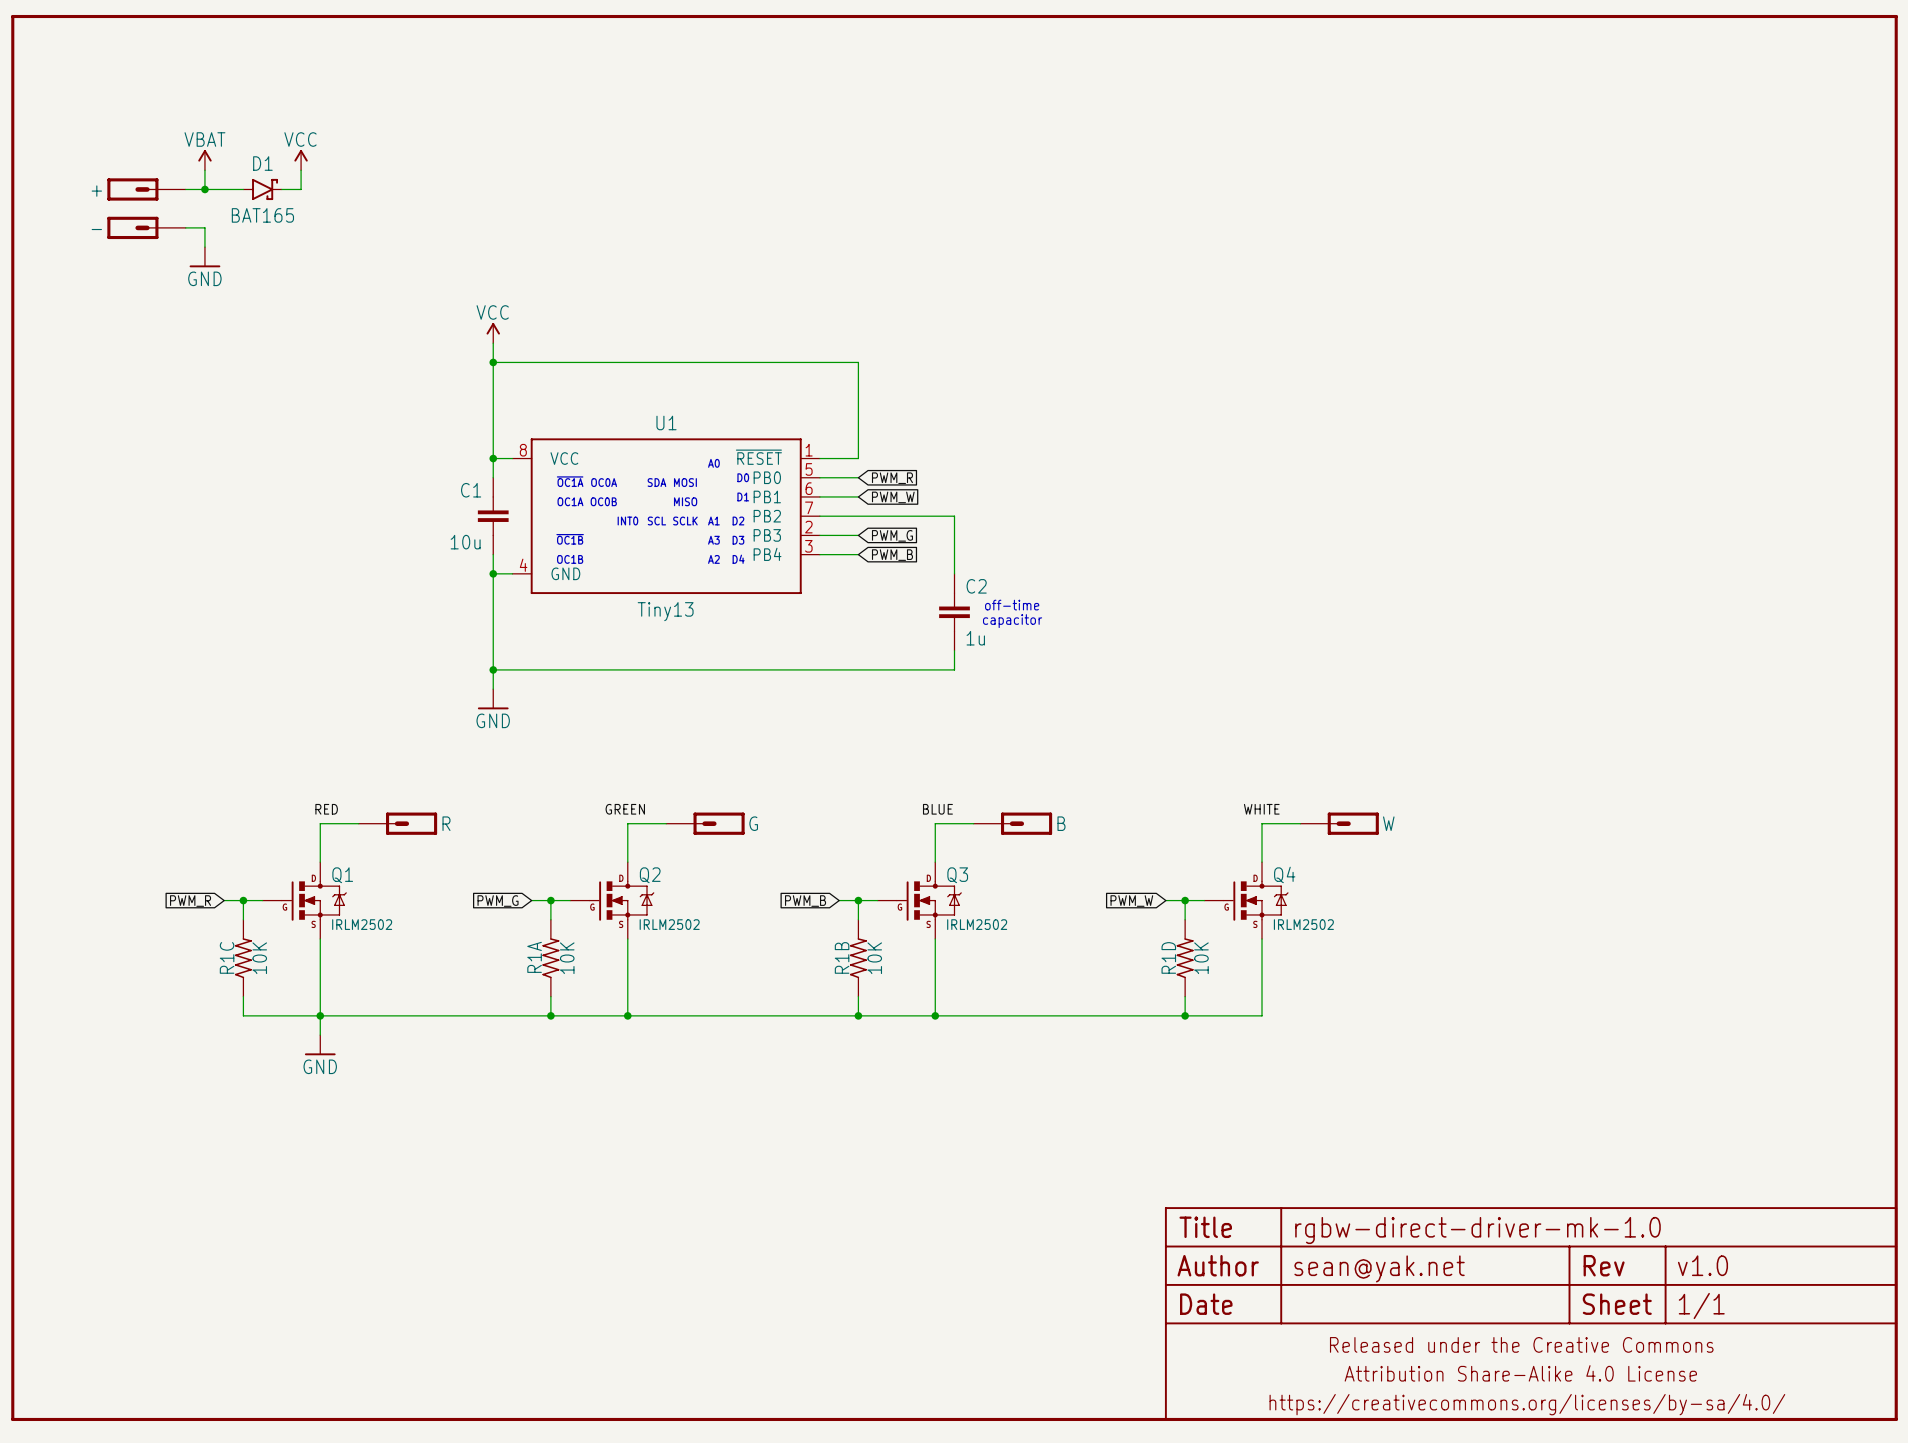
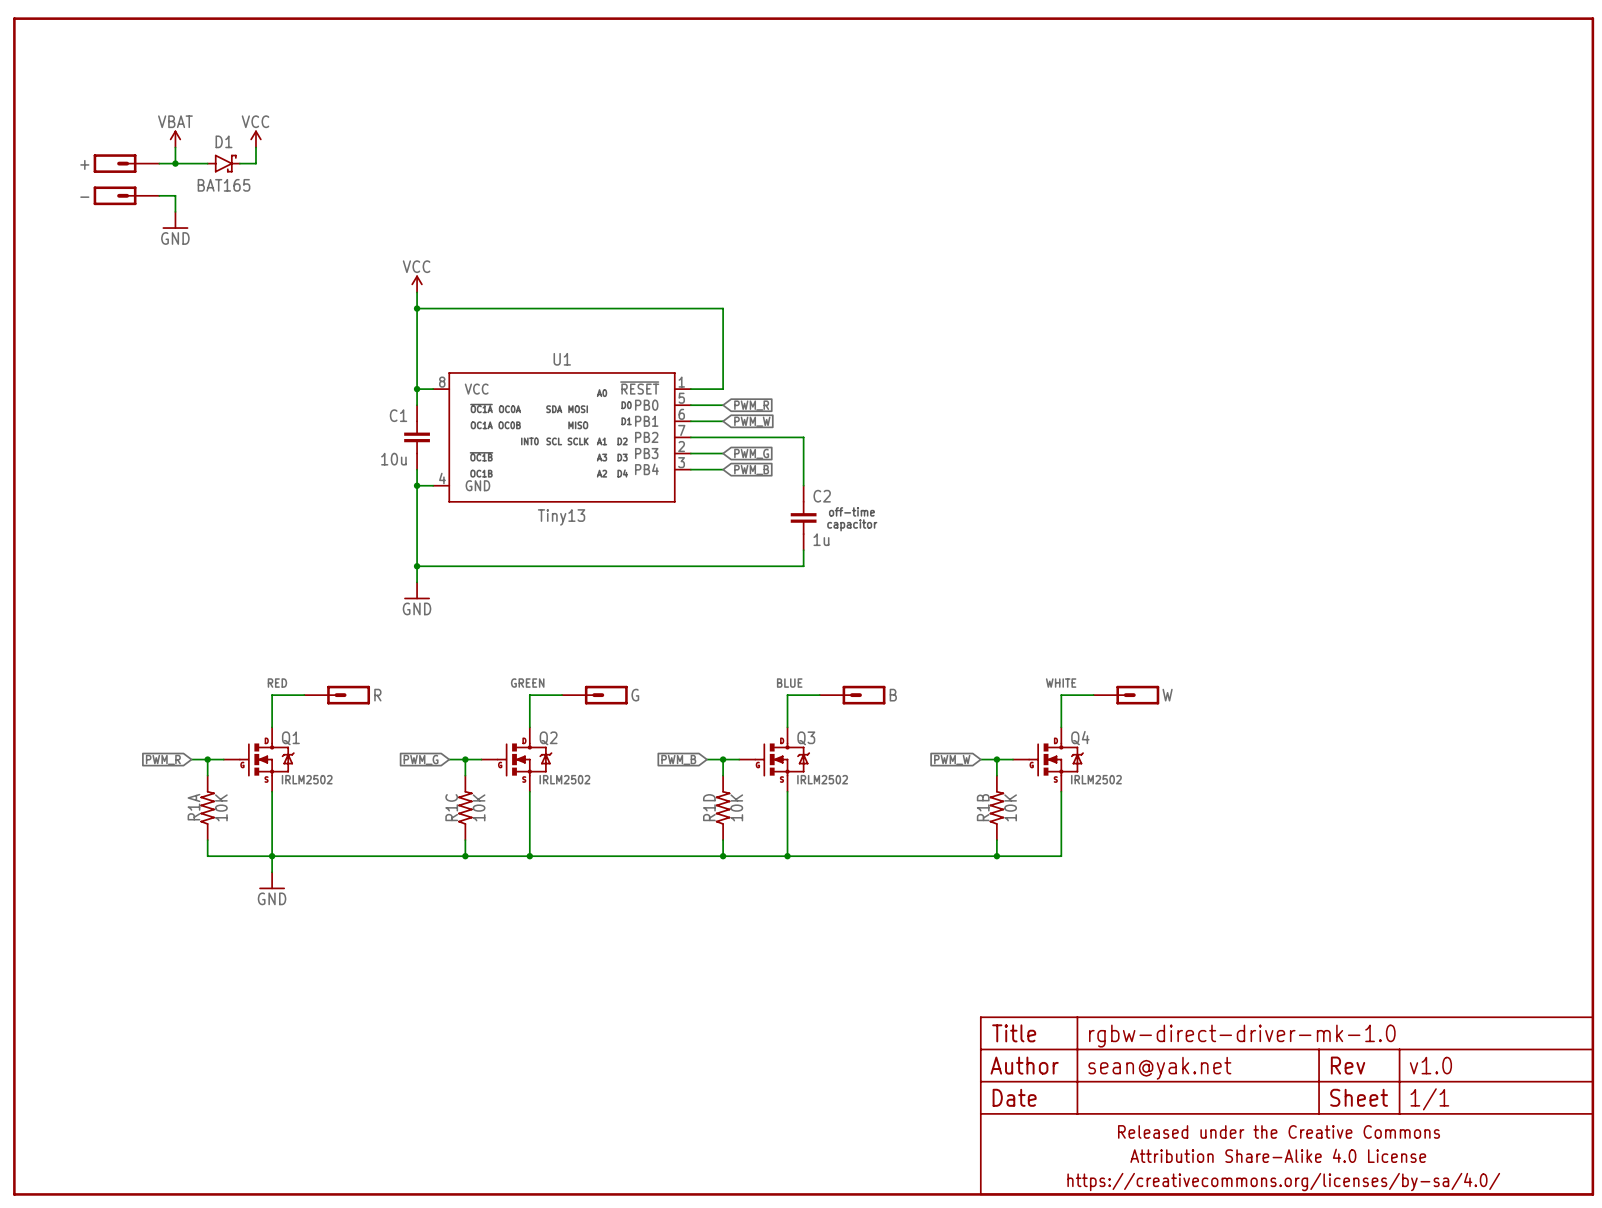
R1C name: R1C (227, 957) -> R1A (193, 807)
R1A name: R1A (534, 957) -> R1C (451, 807)
R1B name: R1B (842, 957) -> R1D (709, 807)
R1D name: R1D (1168, 957) -> R1B (983, 807)

